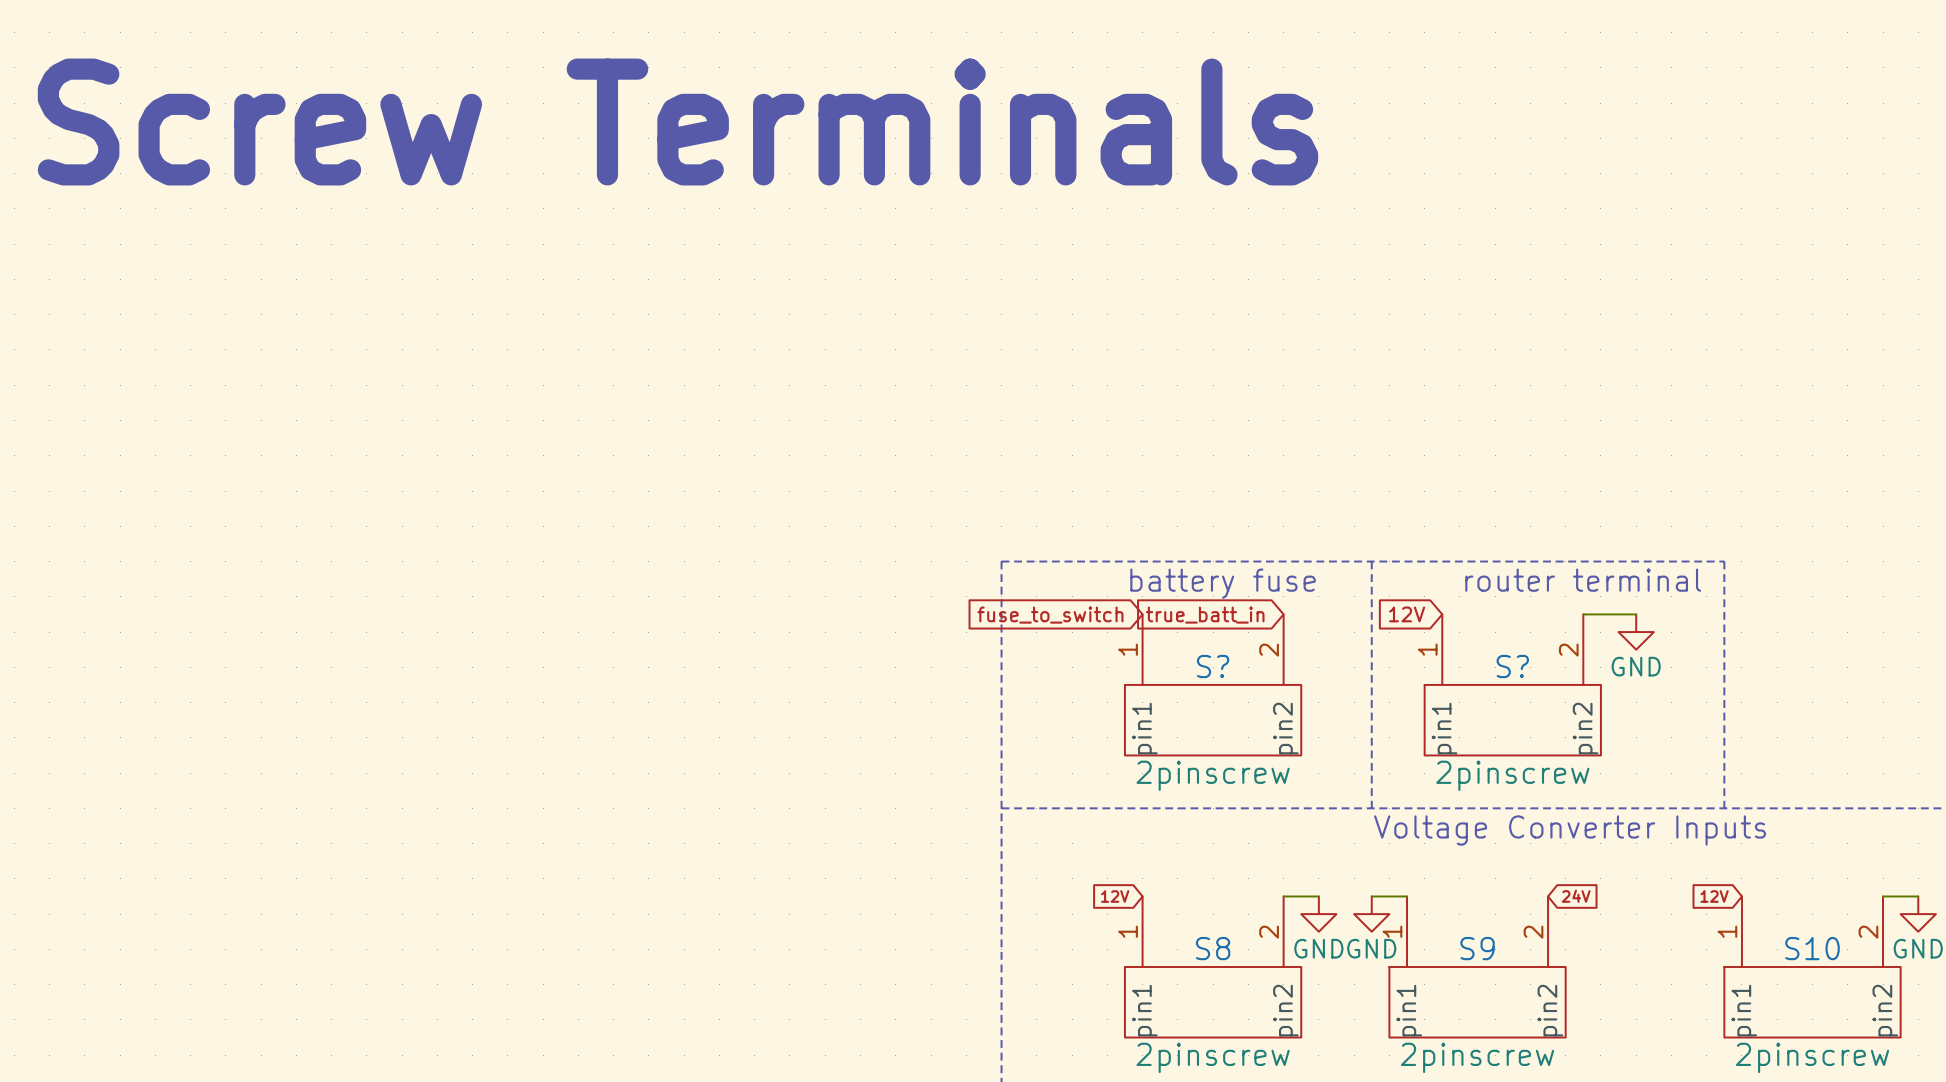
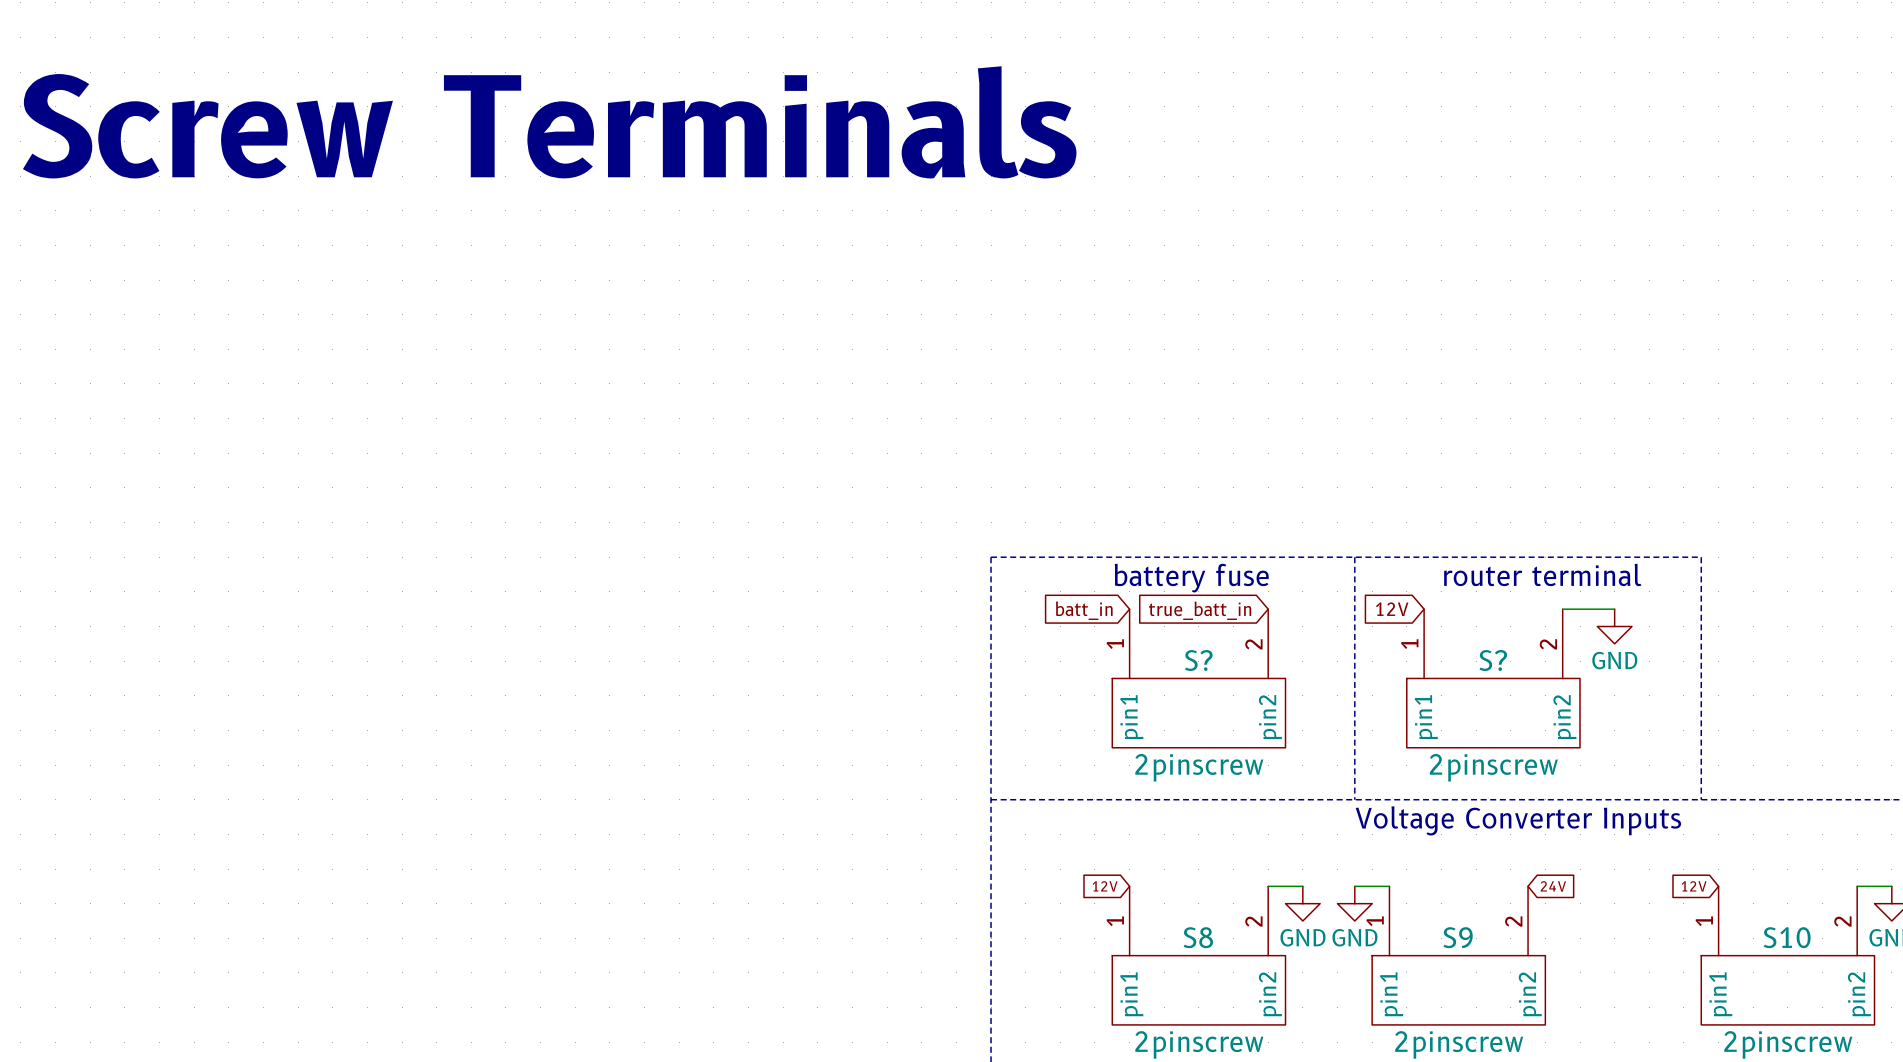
global label: fuse_to_switch (1050, 615) -> batt_in (1084, 610)

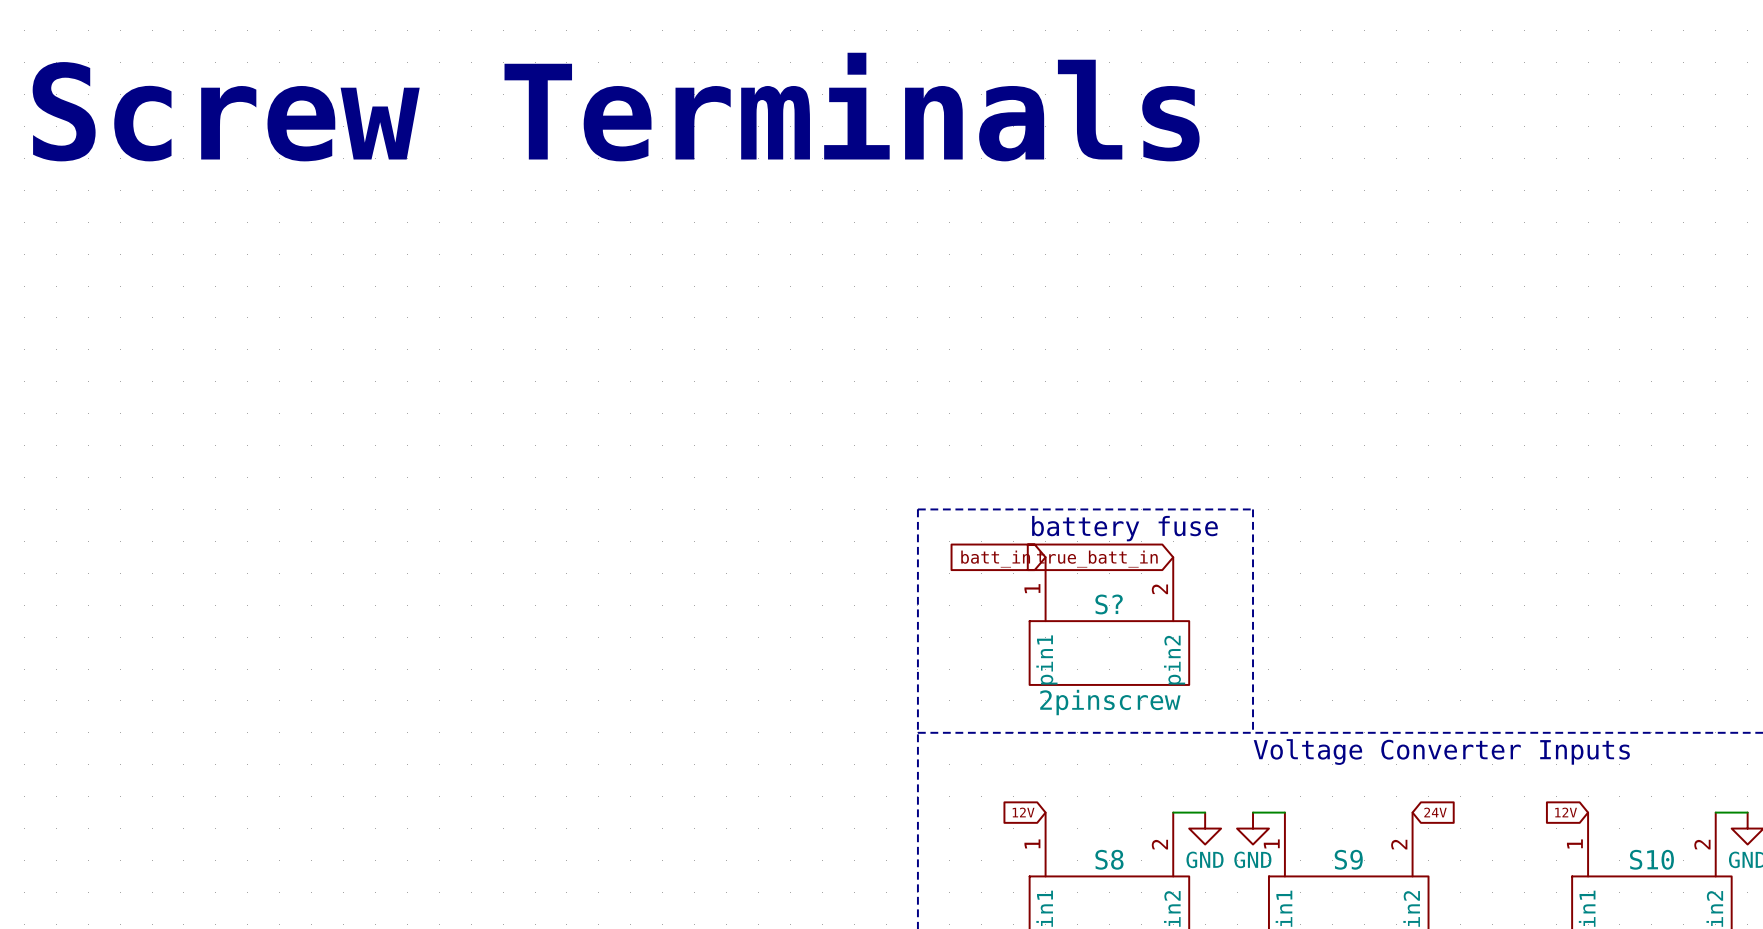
line: (1354, 557) (1701, 557) (1701, 799) -> none
text: router terminal (1542, 574) -> none
global label: 12V (1392, 609) -> none
wire: (1562, 609) (1614, 609) -> none
power symbol: GND (1614, 626) -> none
S?: 2pinscrew (1493, 678) -> none

